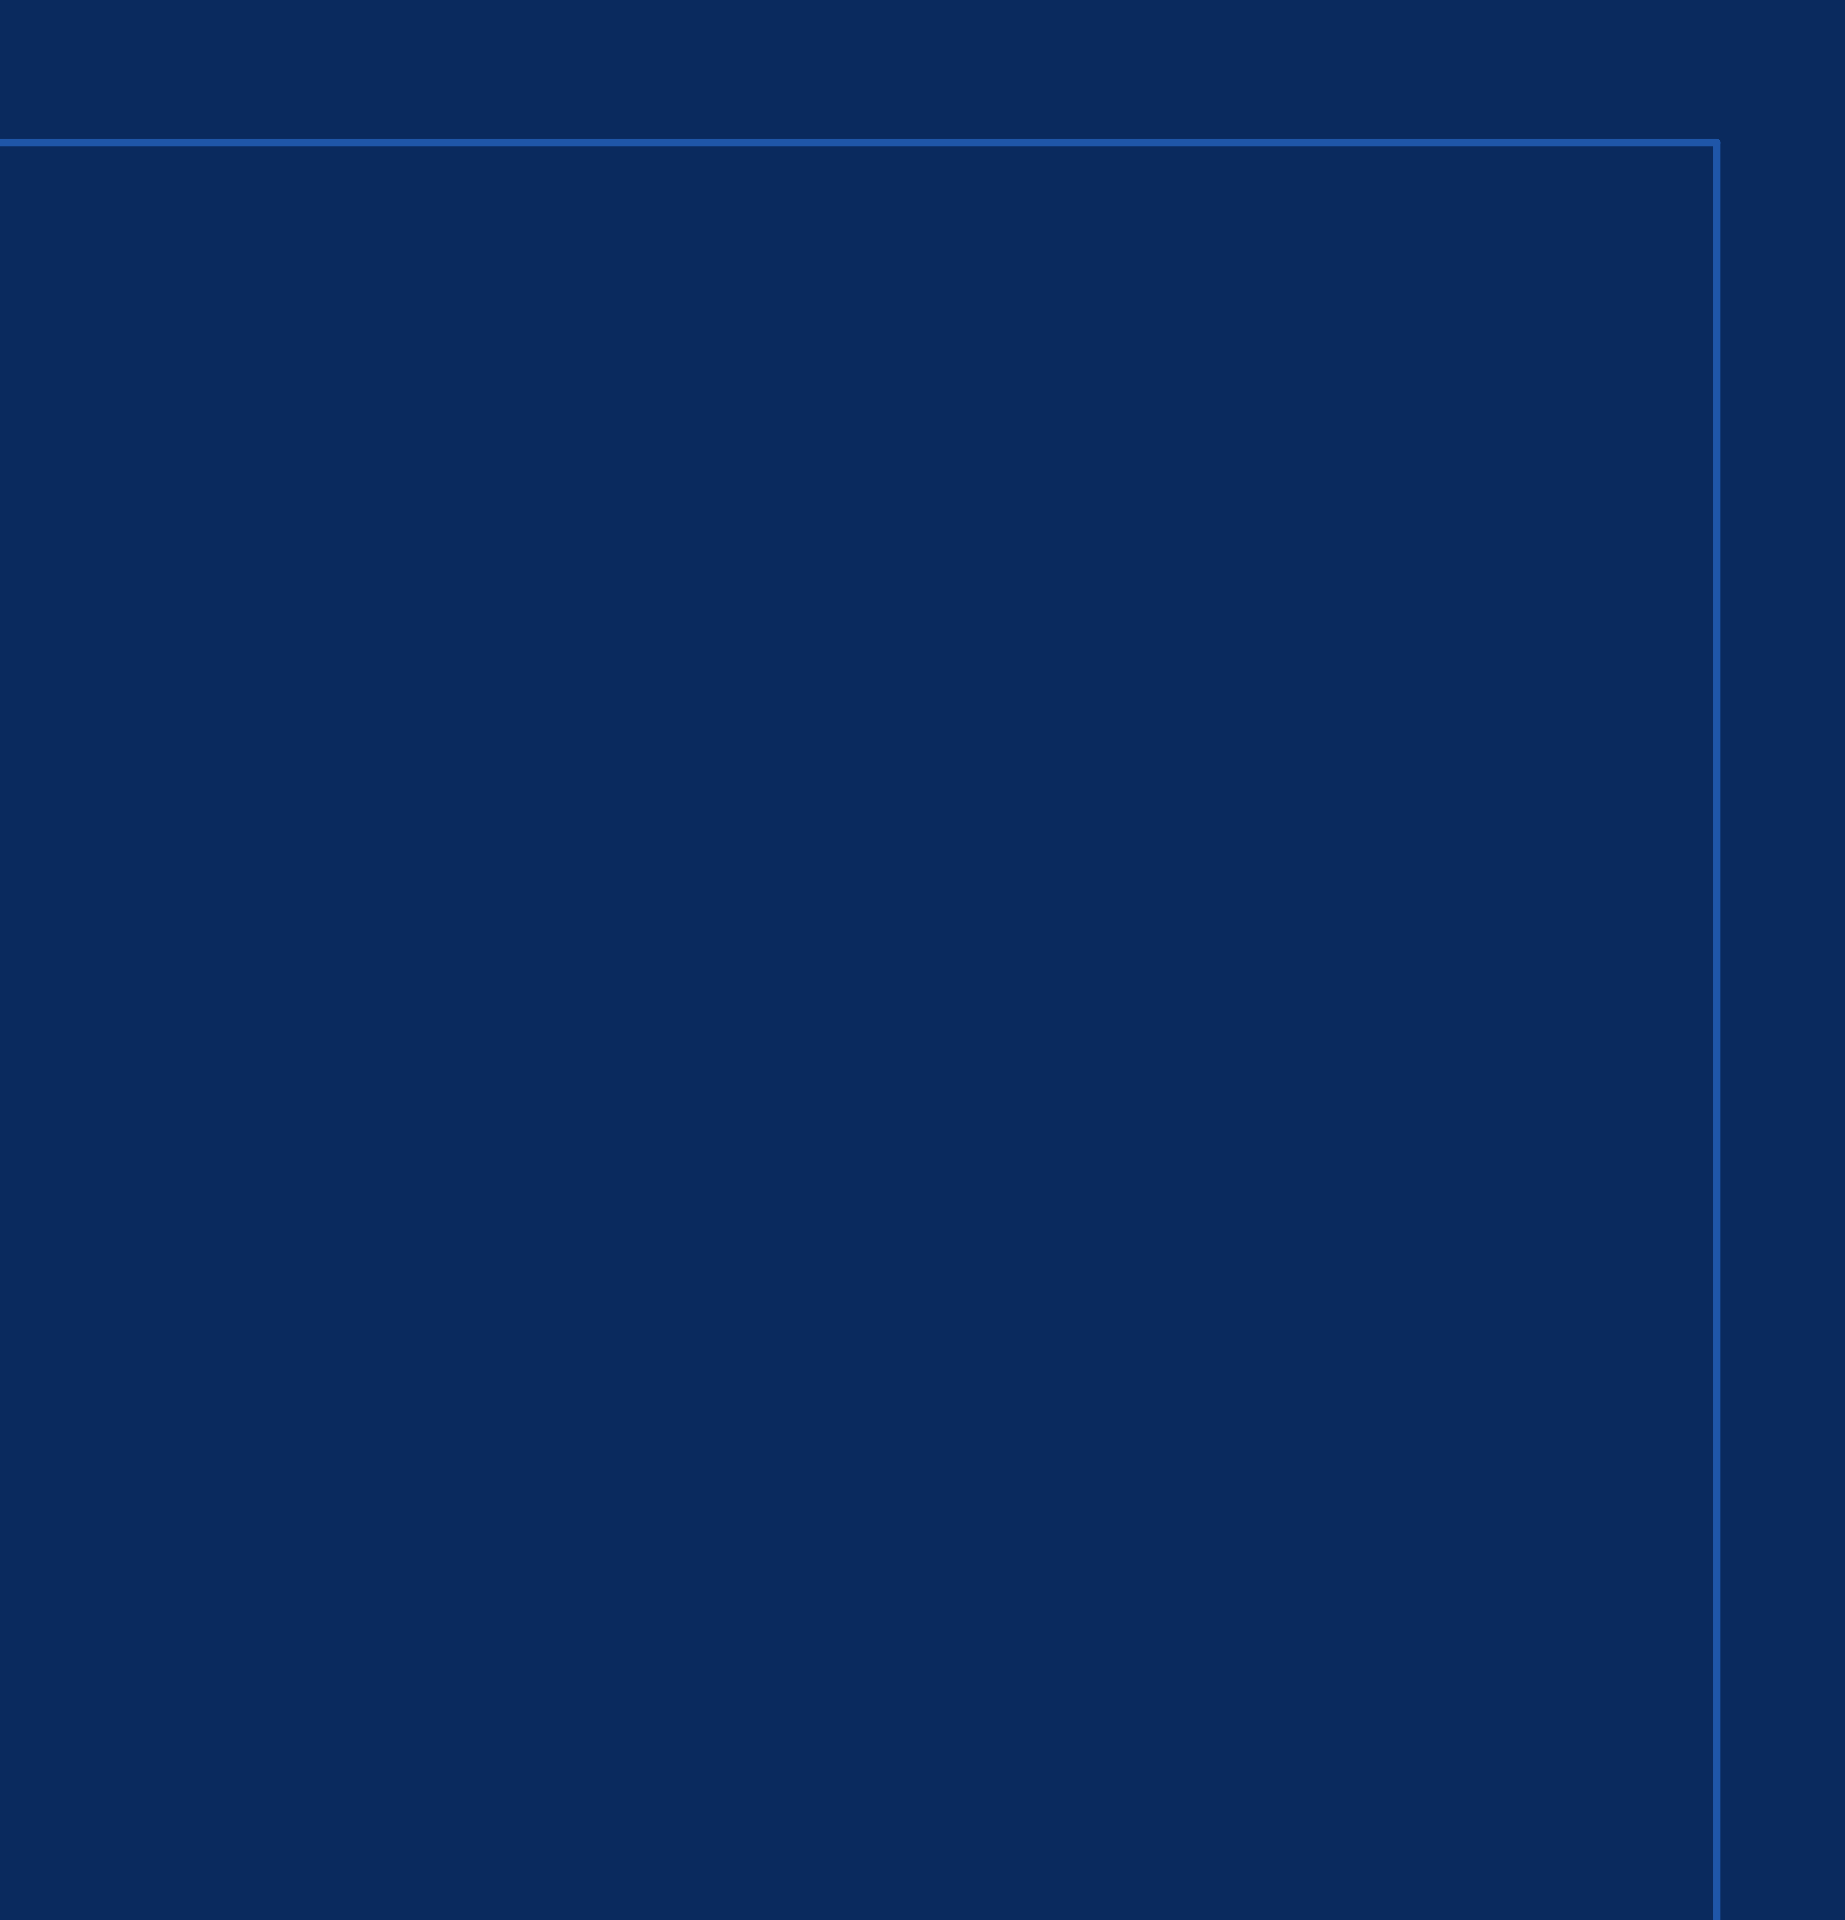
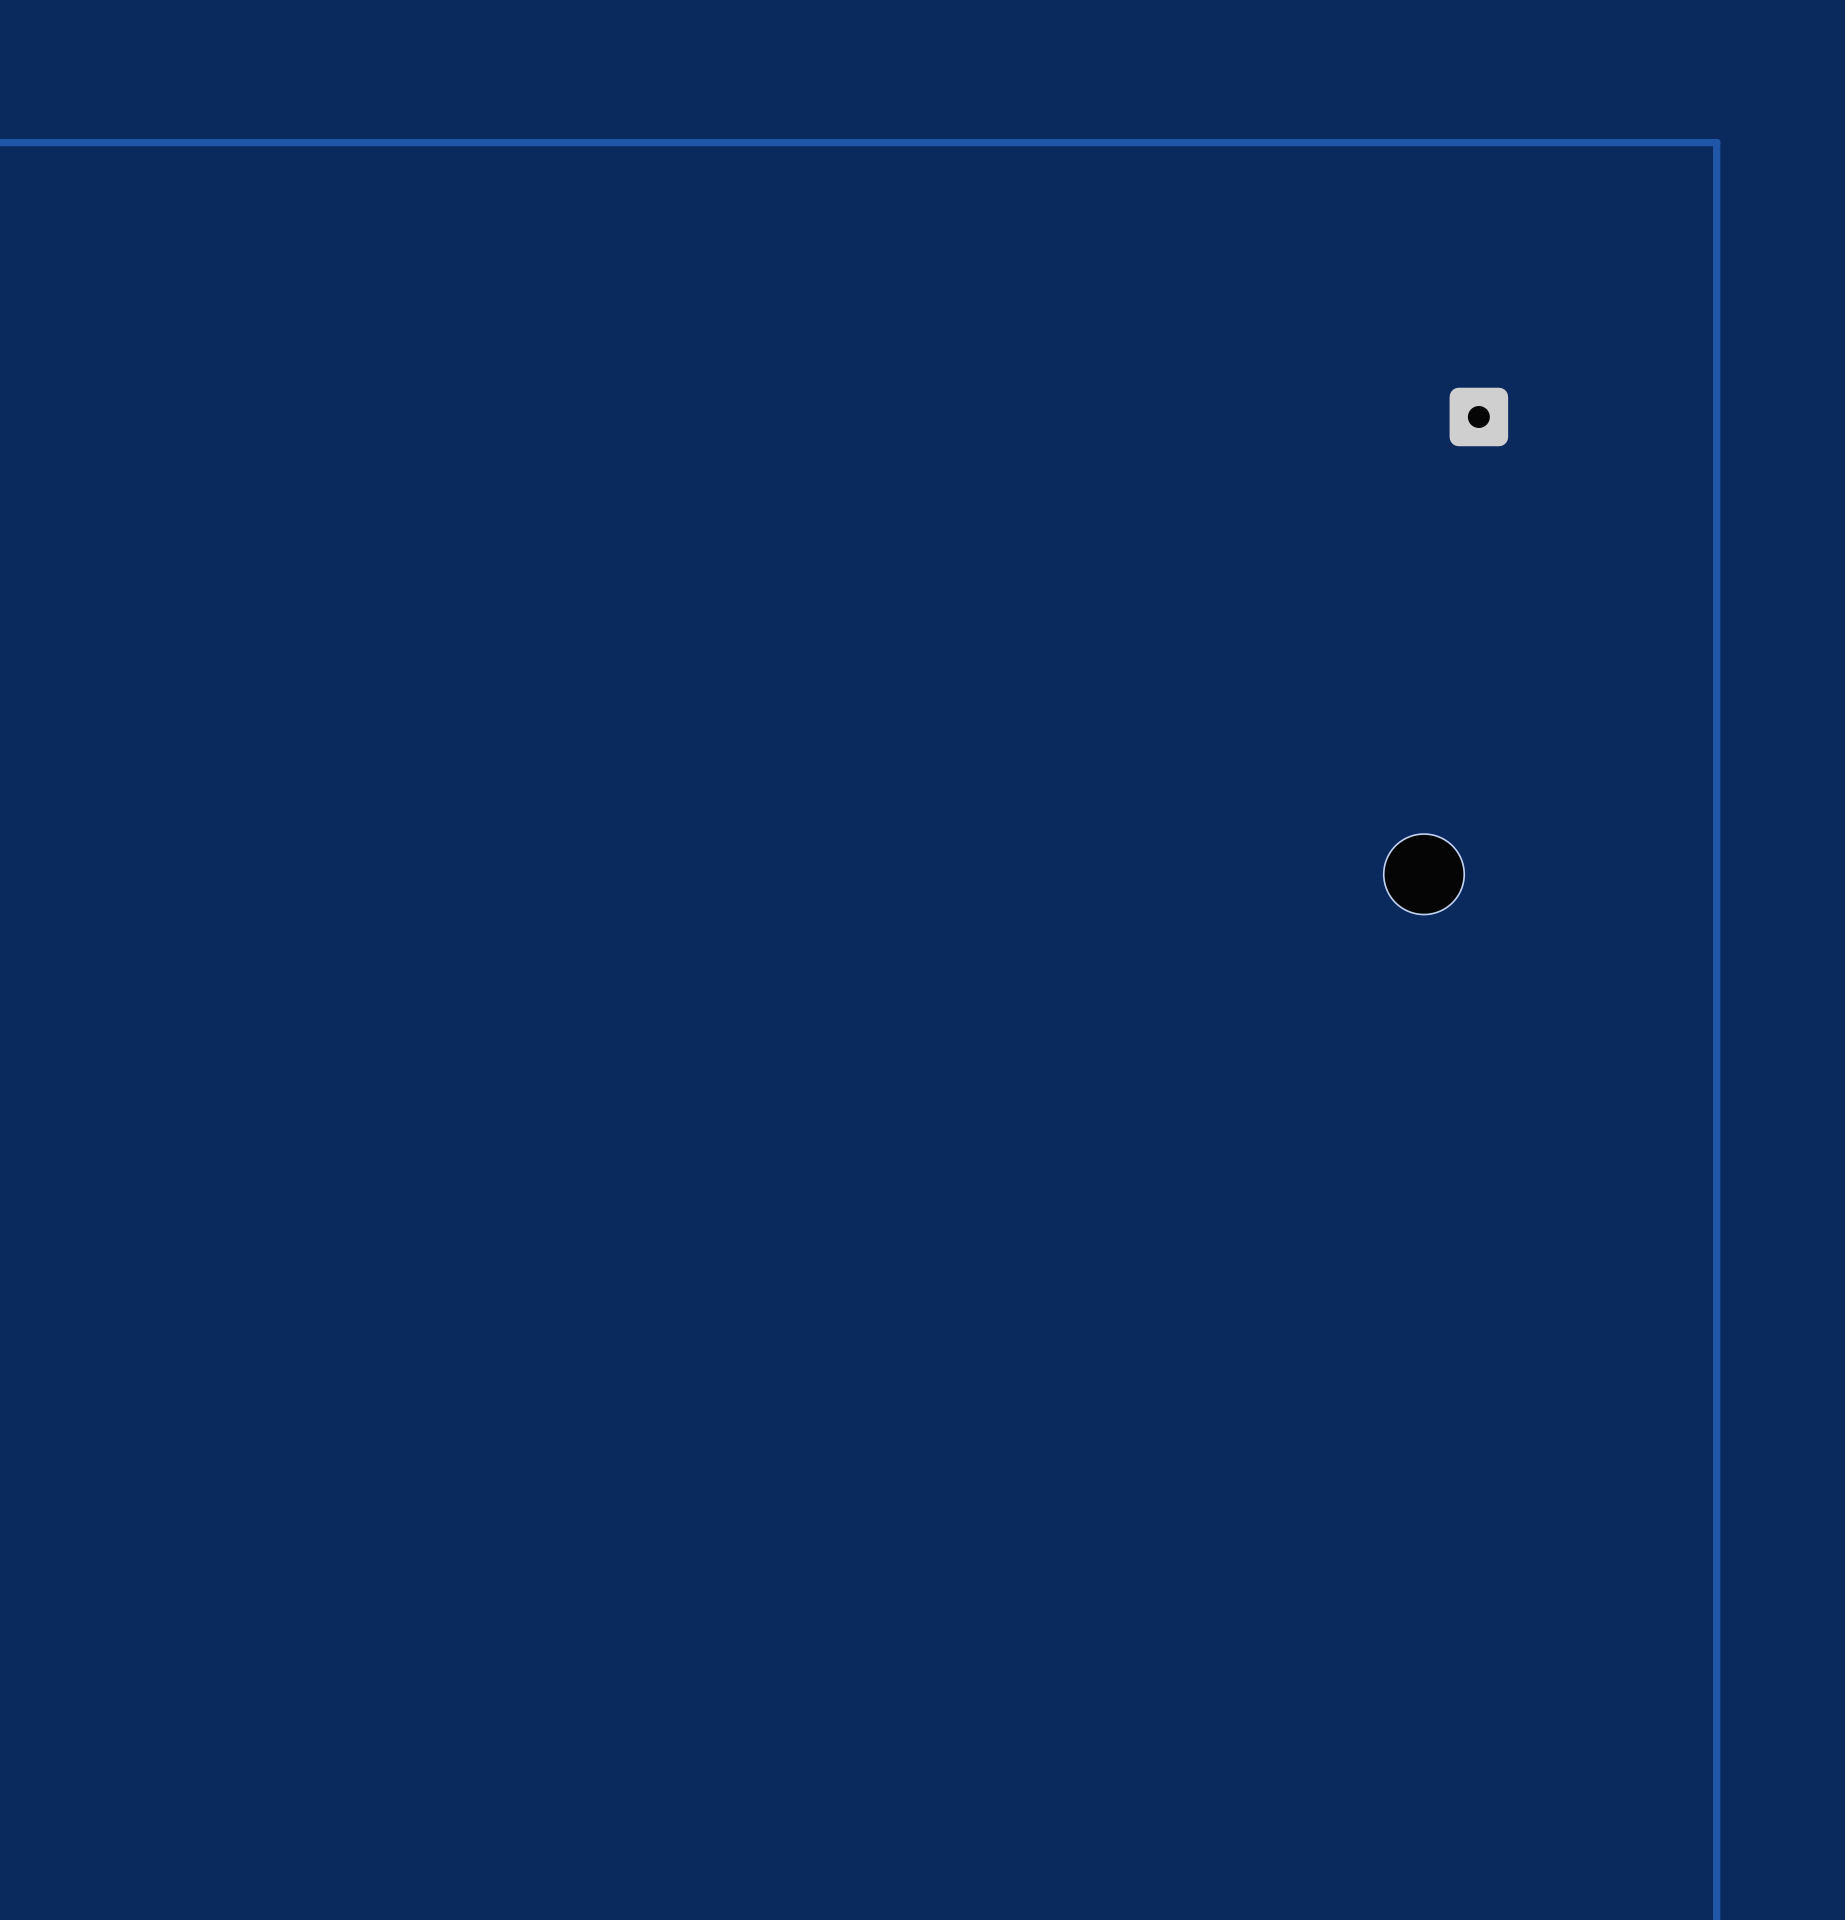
part: none -> (1478, 416)
part: none -> (1423, 874)

